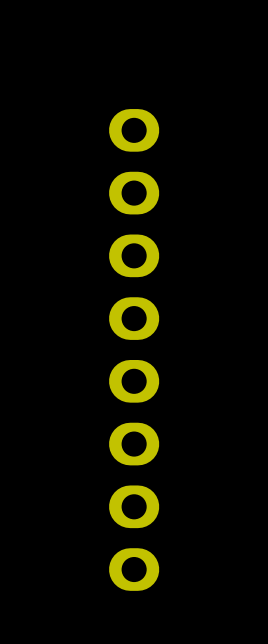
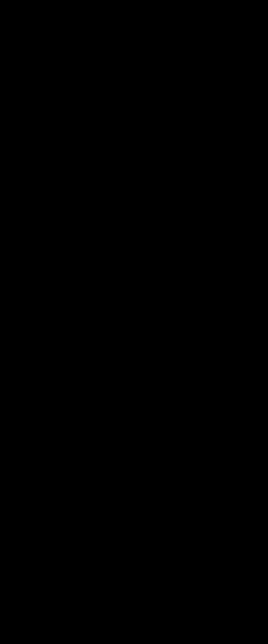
part: (134, 349) -> none

